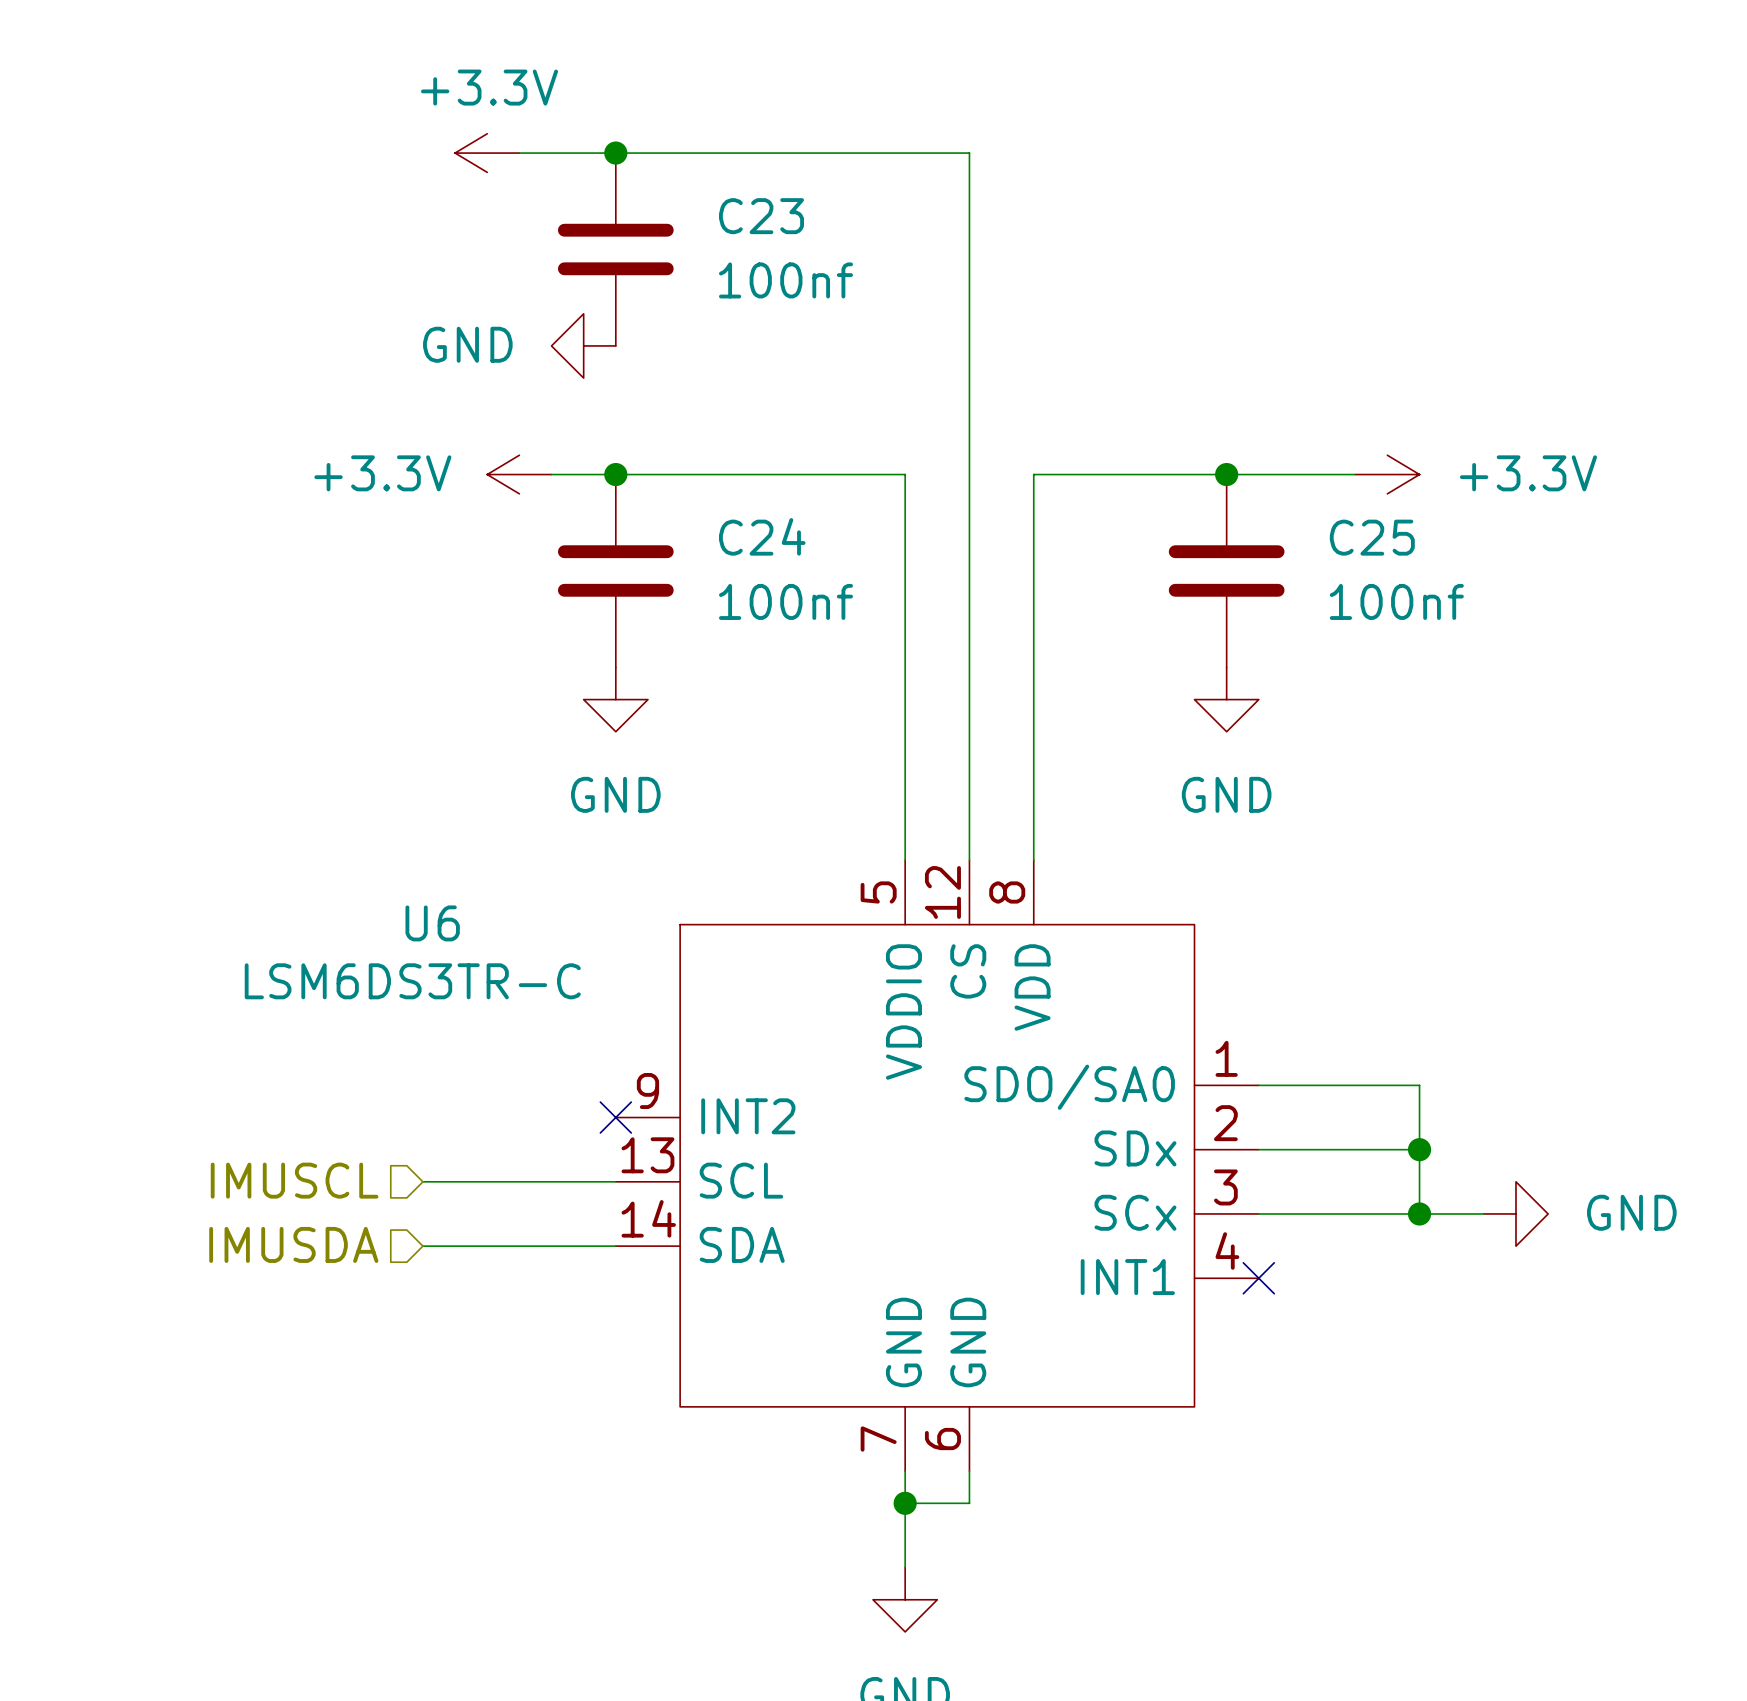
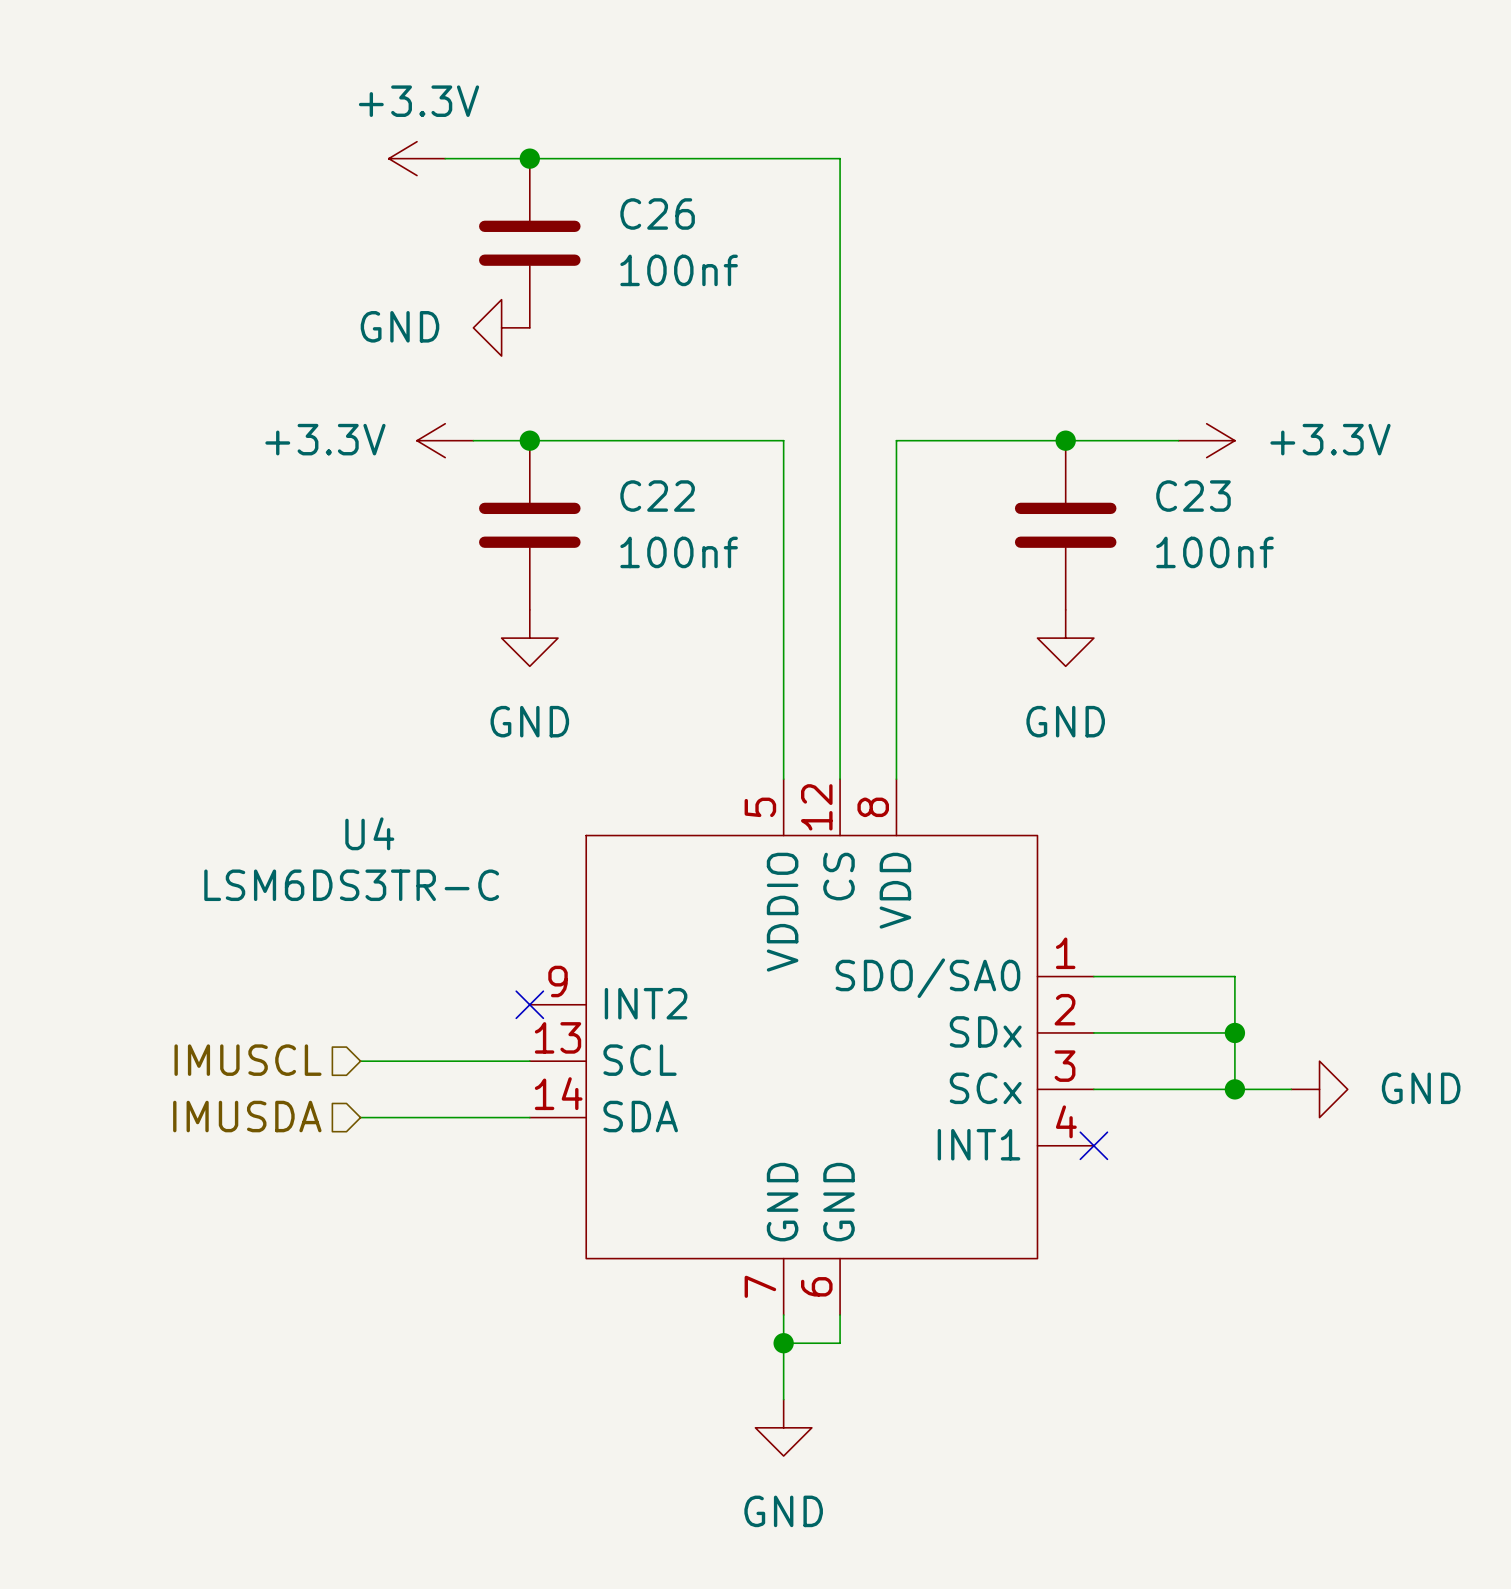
C23 name: C23 (761, 216) -> C26 (657, 213)
C24 name: C24 (762, 536) -> C22 (657, 496)
C25 name: C25 (1372, 537) -> C23 (1193, 496)
U6 name: U6 (432, 923) -> U4 (369, 833)

